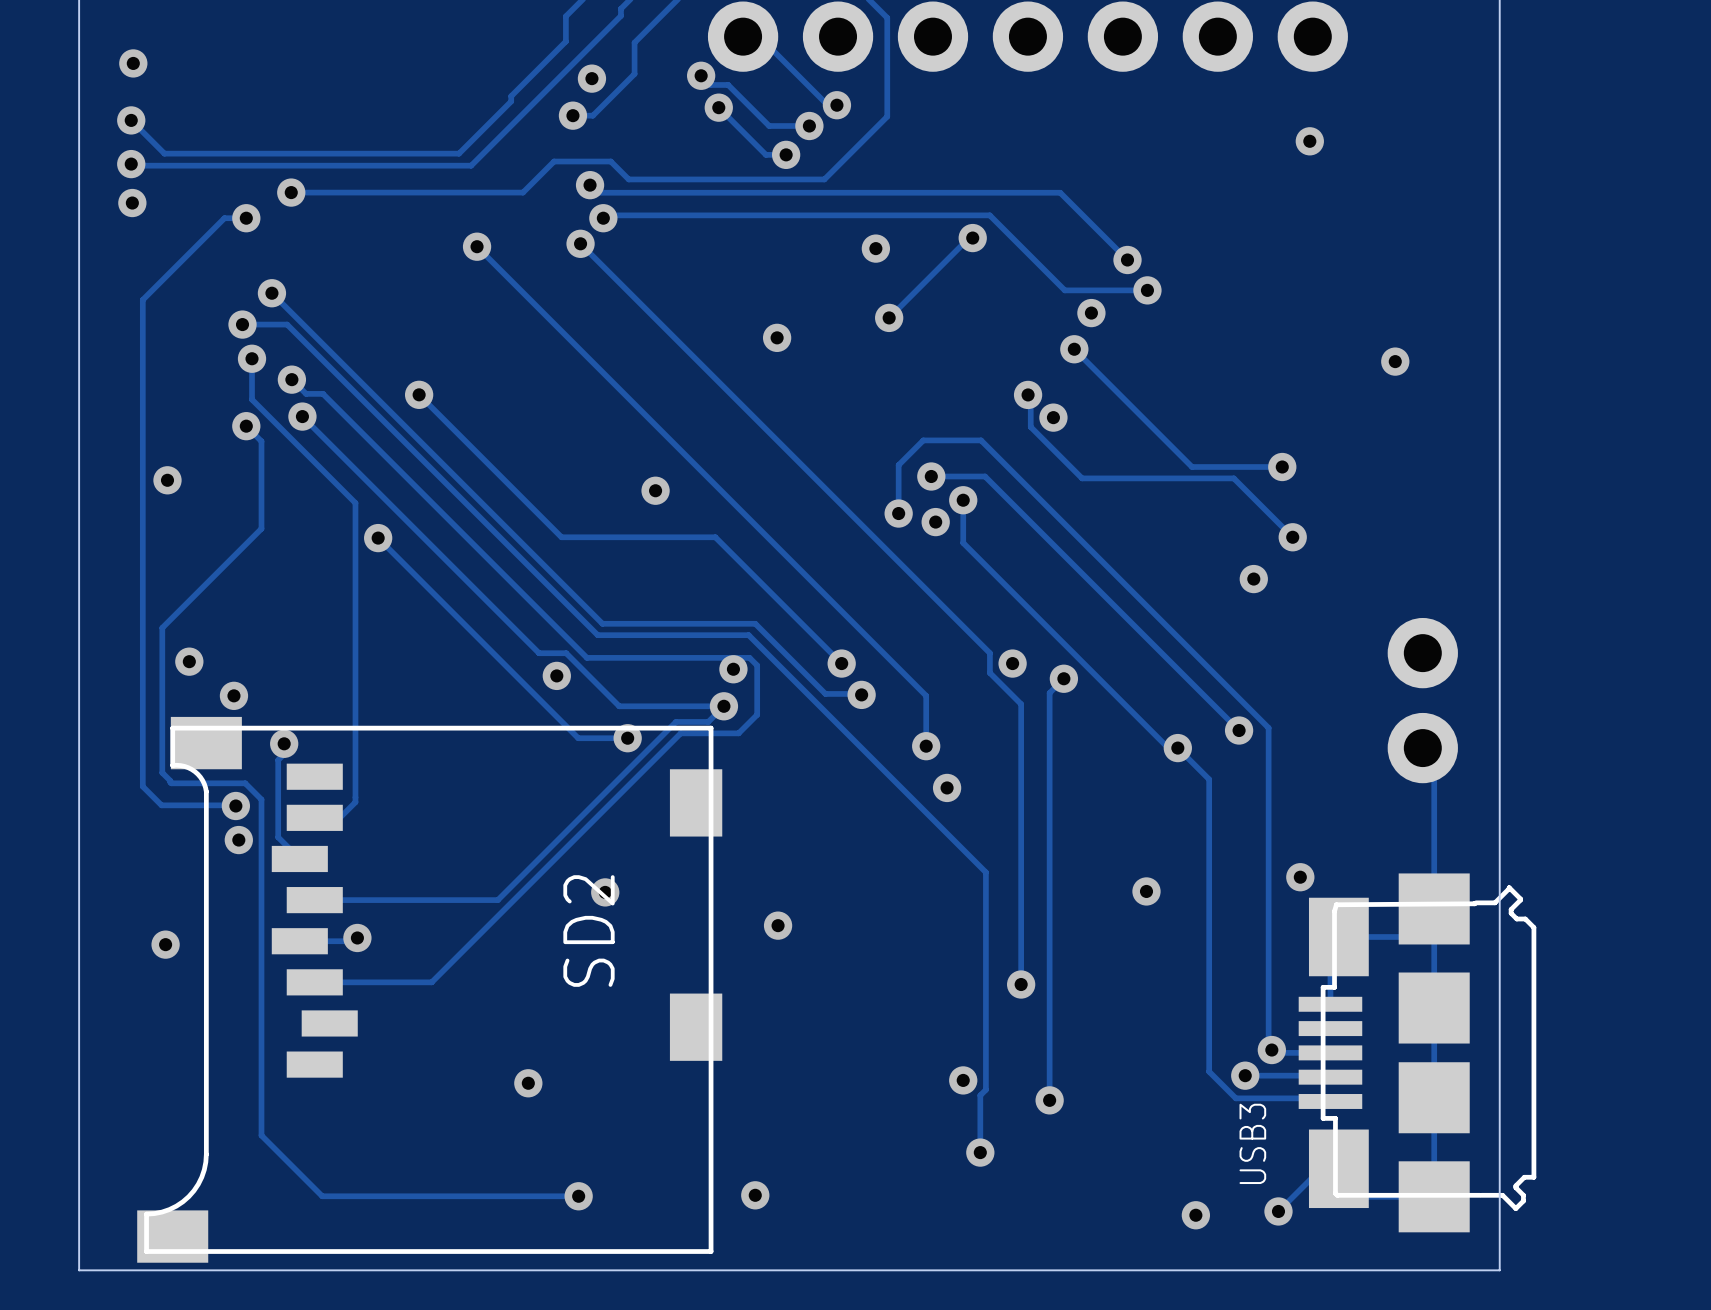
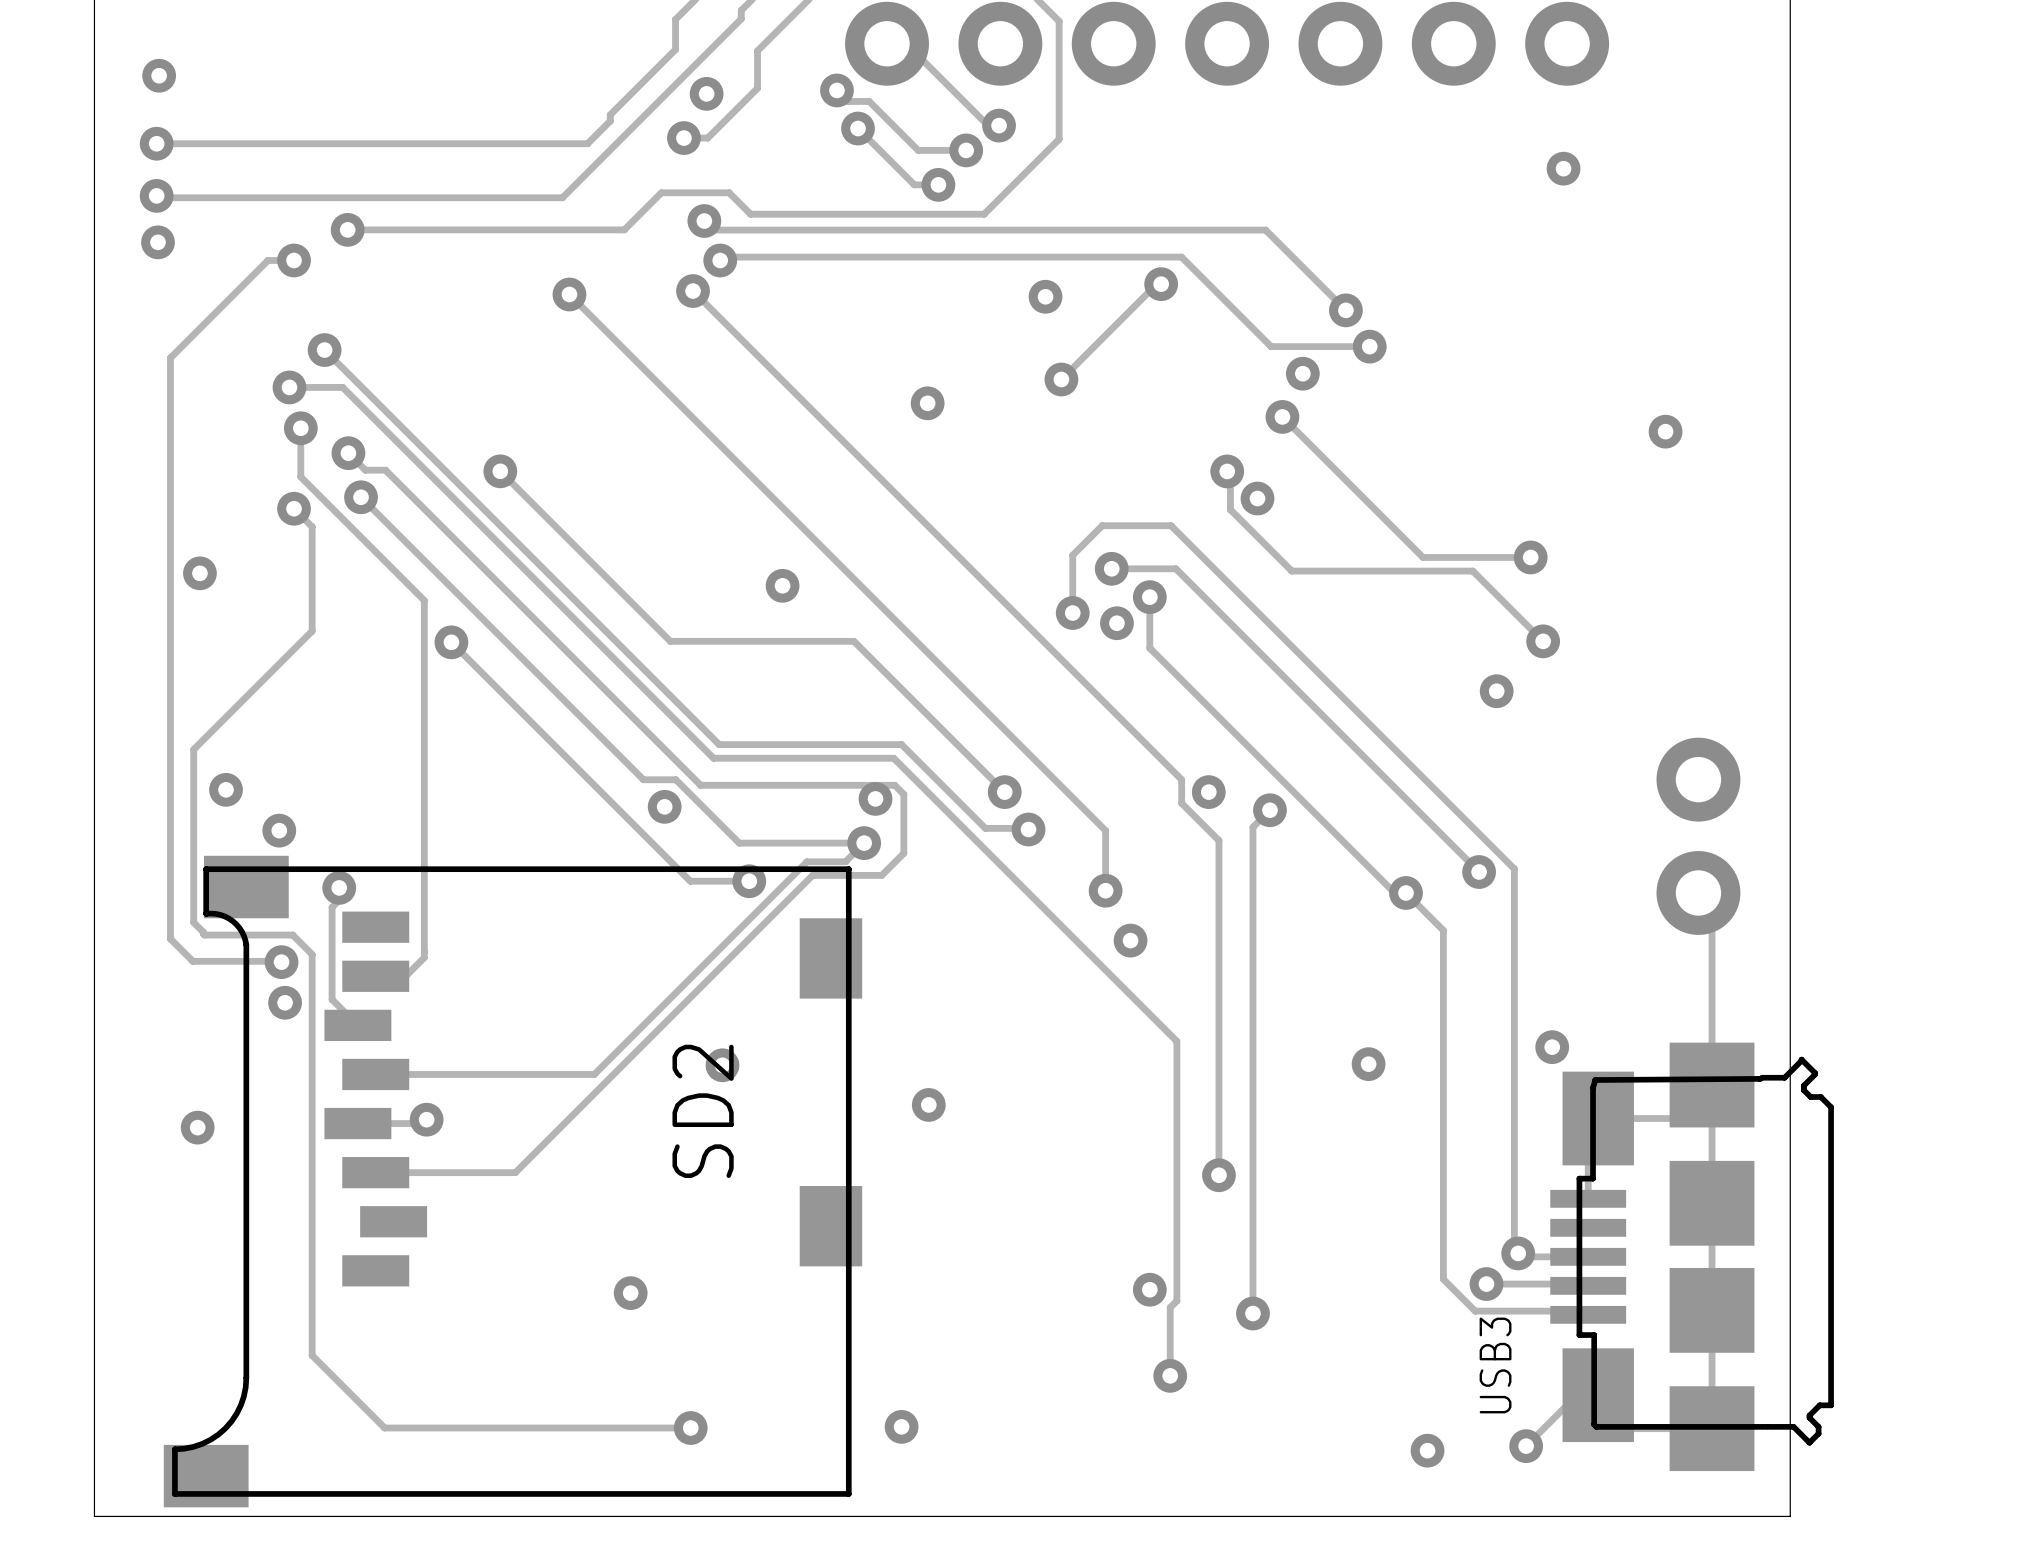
track: (492, 120) (459, 153) (164, 153) (131, 120) -> (587, 143) (156, 143)

